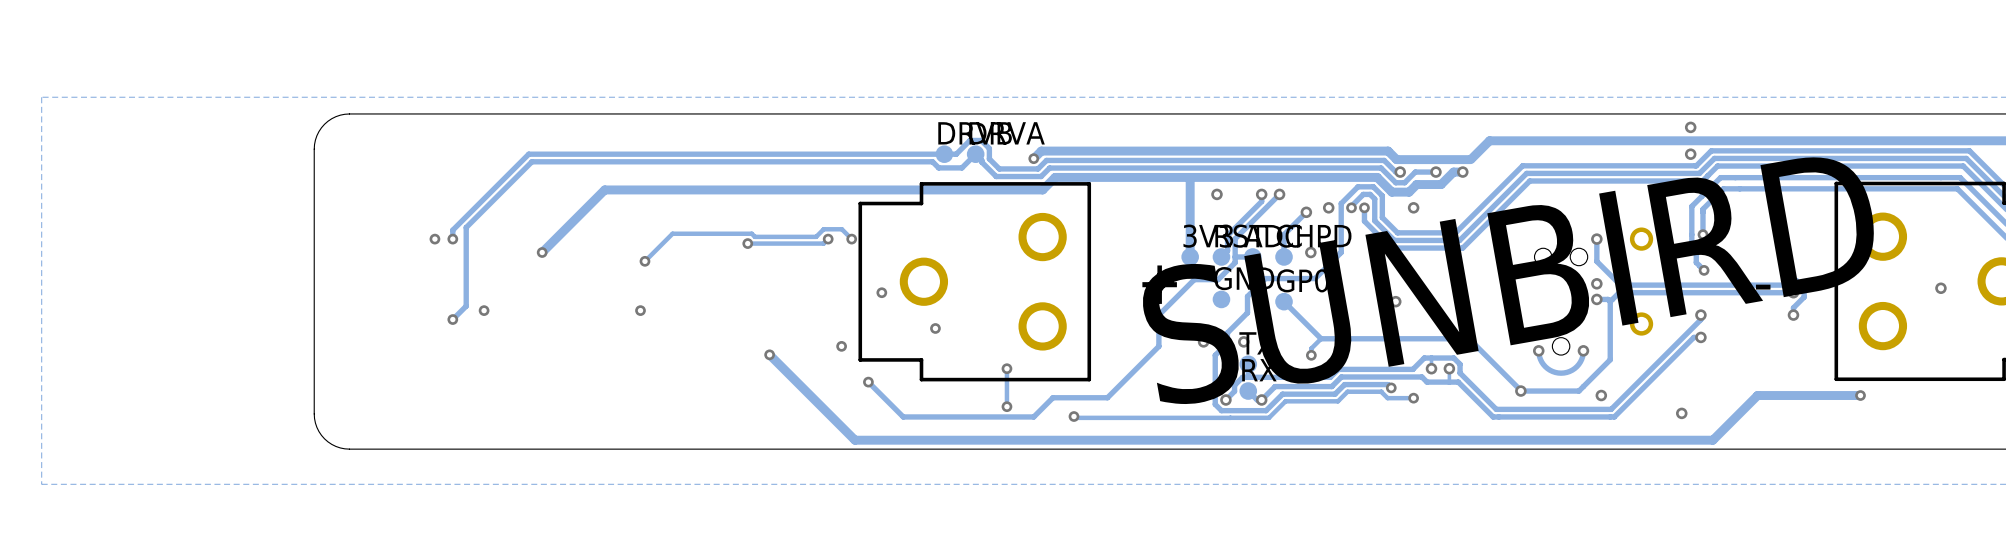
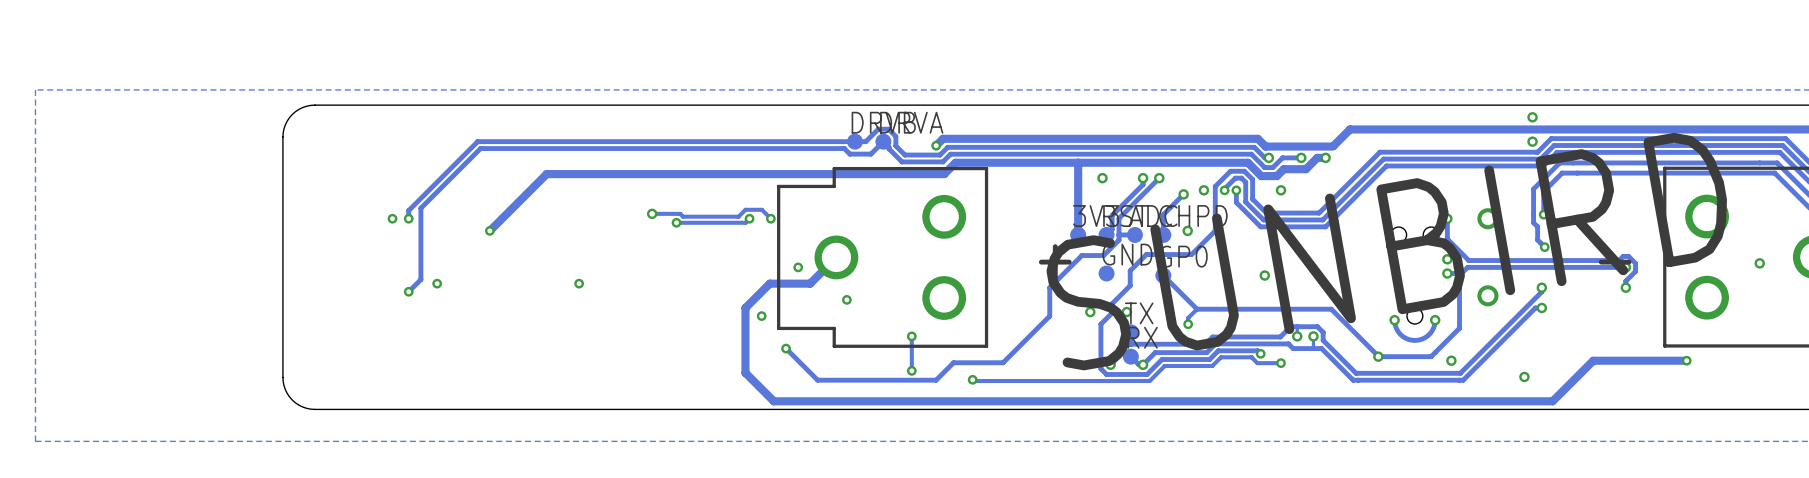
track: (720, 233) (672, 233) (644, 261) -> none
via: none -> (652, 213)
via: (644, 261) -> none
track: (769, 354) (823, 408) -> (836, 257) (810, 283) (769, 283) (745, 307) (745, 372)
via: (769, 354) -> none

